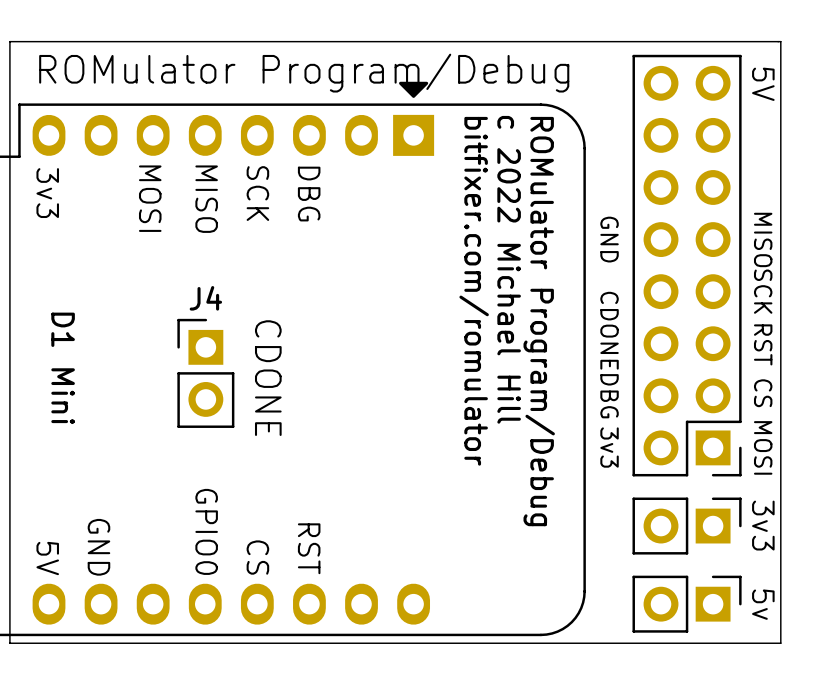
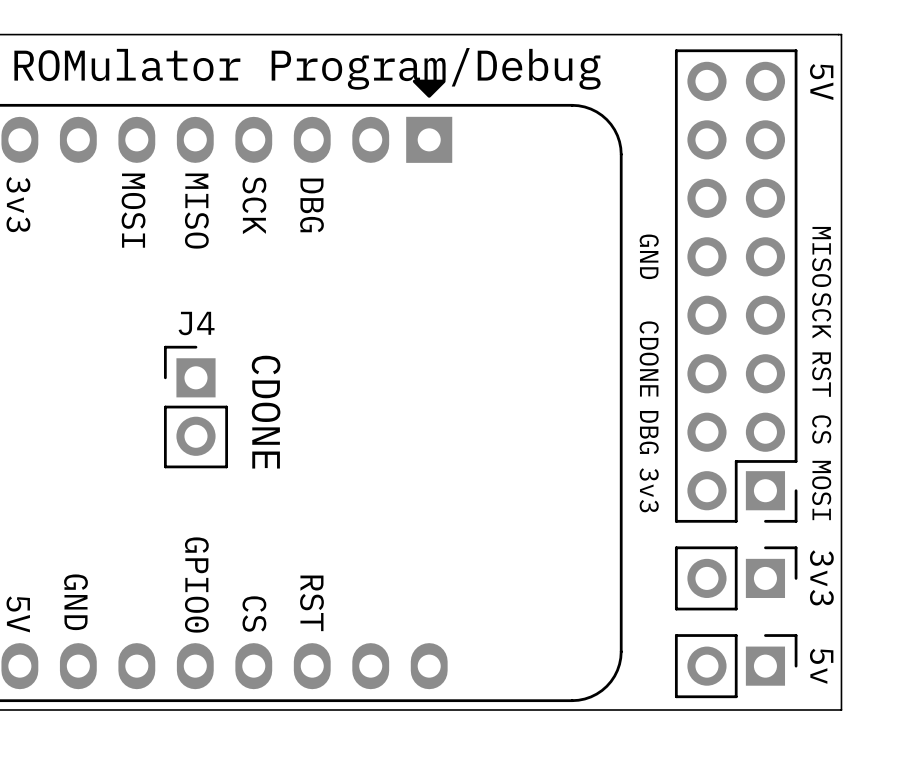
text: c 2022 Michael Hill (509, 269) -> none
text: bitfixer.com/romulator (474, 291) -> none
text: ROMulator Program/Debug (539, 321) -> none
text: D1 Mini (63, 368) -> none

